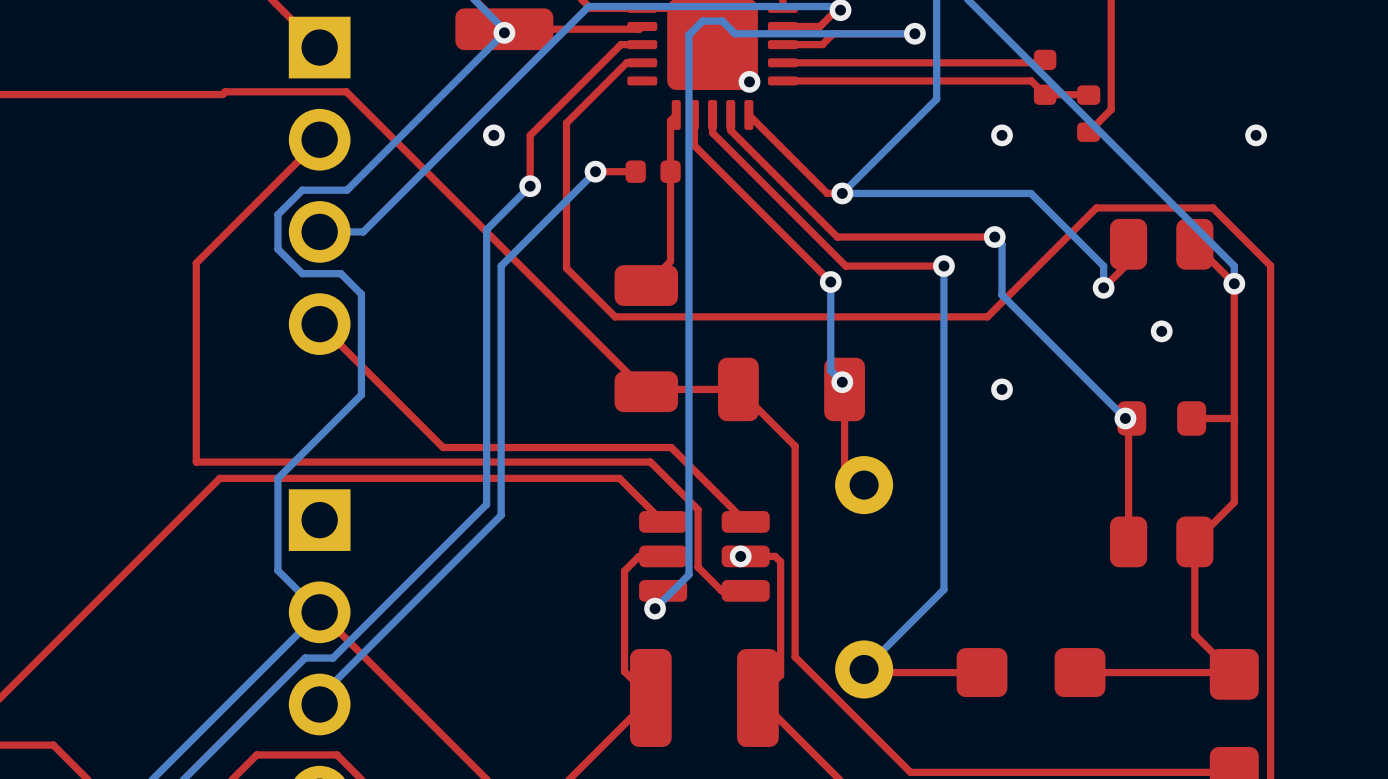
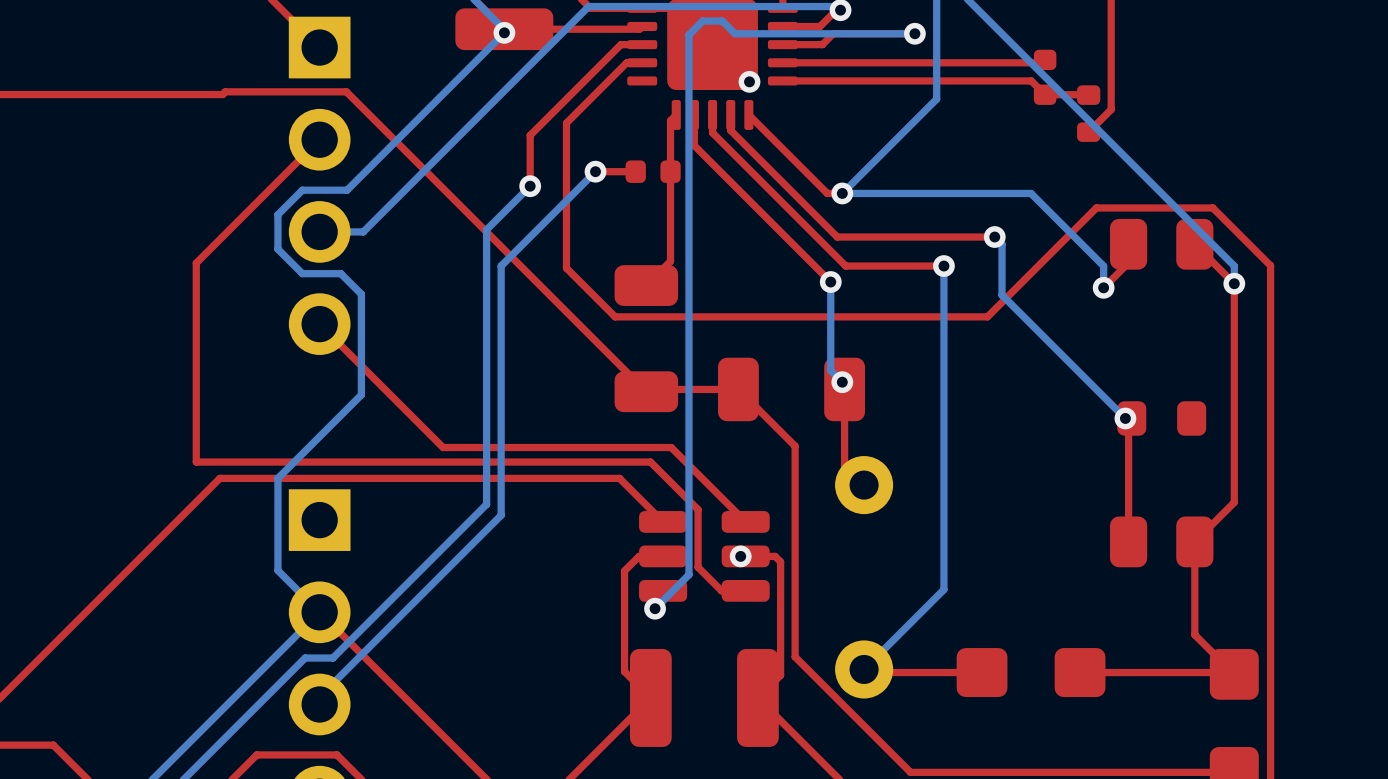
via: (493, 135) -> none
via: (1002, 135) -> none
via: (1256, 135) -> none
via: (1161, 331) -> none
via: (1002, 389) -> none
top track: (1234, 418) (1191, 418) -> none

